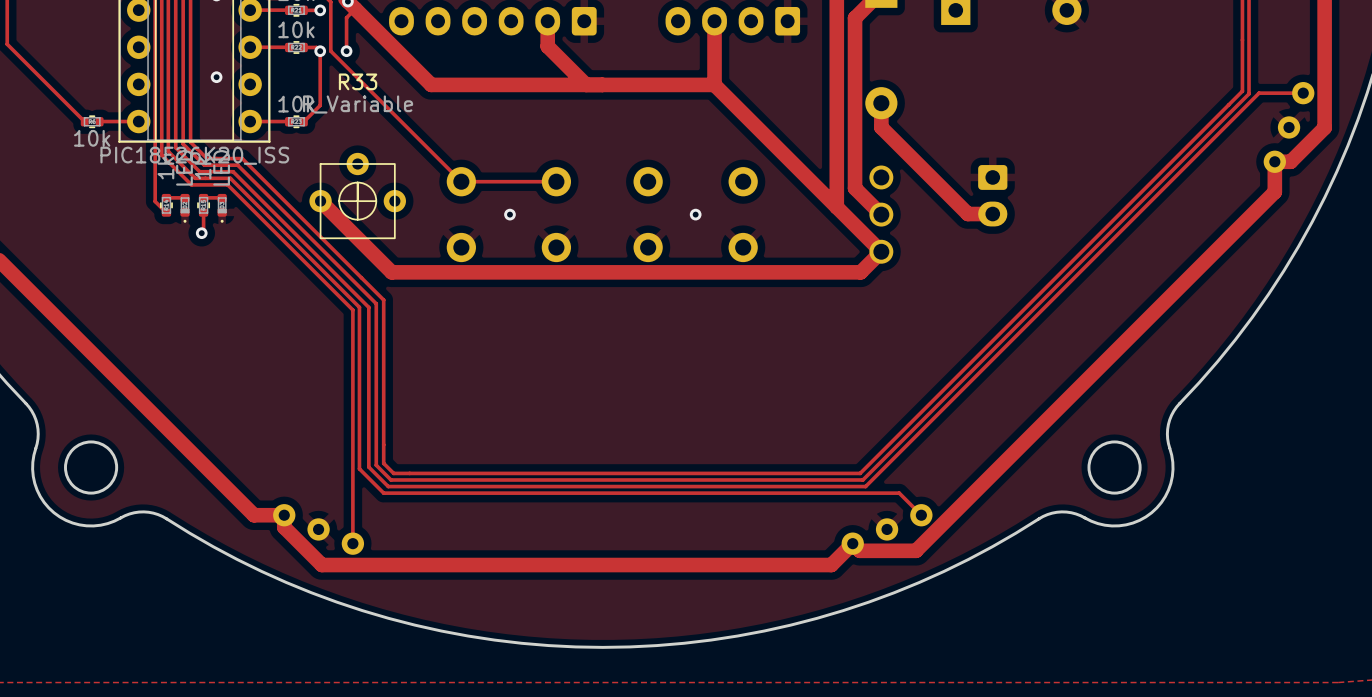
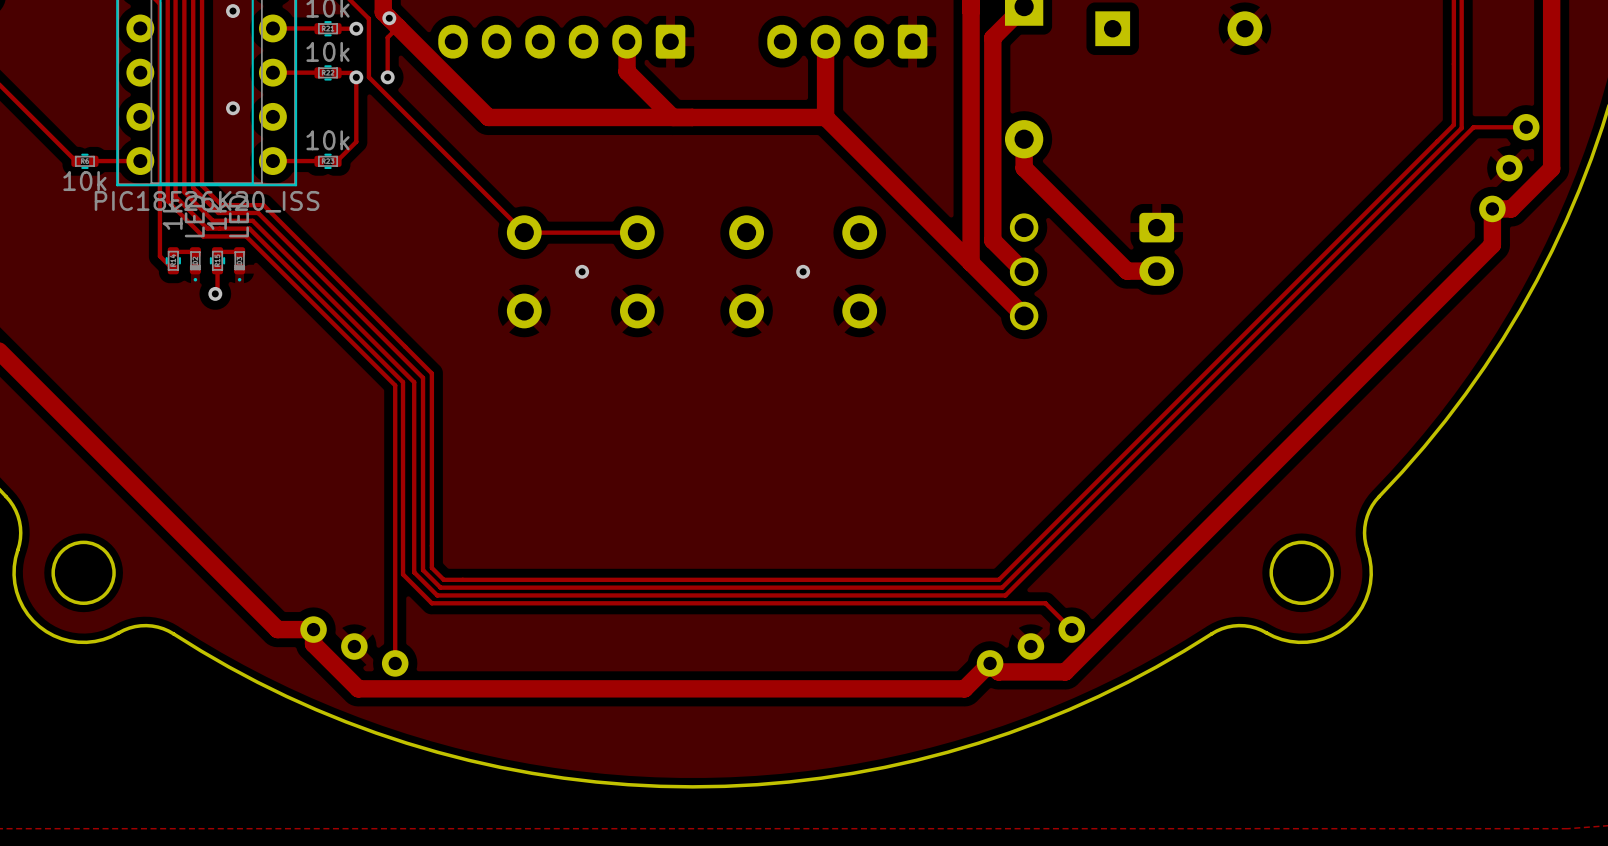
R33: R_Variable (357, 196) -> none
track: (320, 201) (391, 272) (860, 272) (881, 251) -> none

